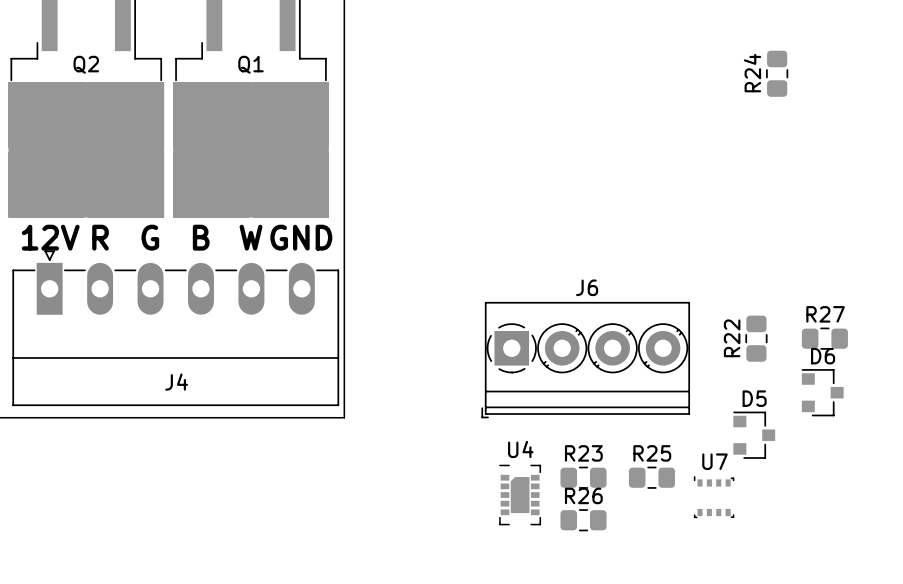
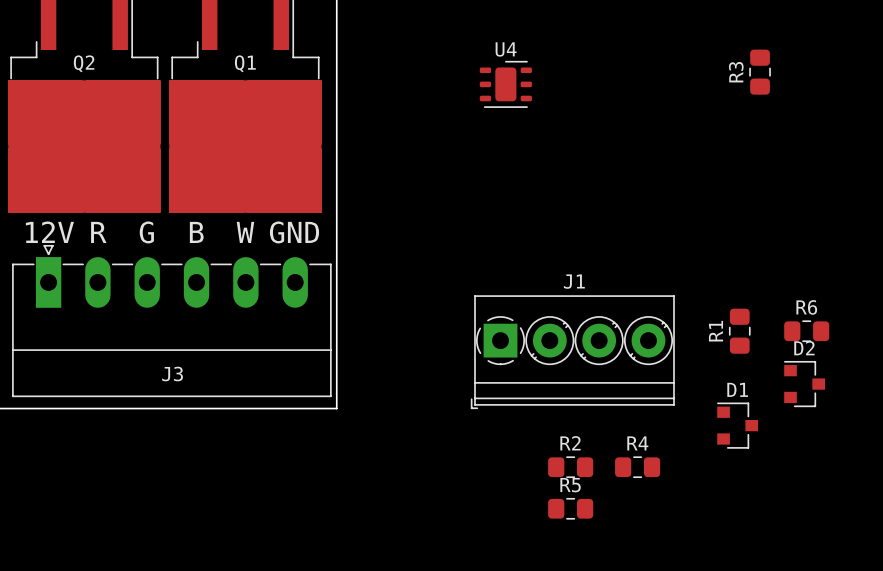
R24 name: R24 (752, 73) -> R3 (736, 72)
J6 name: J6 (587, 287) -> J1 (574, 281)
R27 name: R27 (825, 314) -> R6 (806, 307)
R22 name: R22 (732, 338) -> R1 (716, 331)
D6 name: D6 (823, 356) -> D2 (804, 348)
J4 name: J4 (176, 382) -> J3 (172, 374)
D5 name: D5 (754, 398) -> D1 (737, 389)
R23 name: R23 (583, 453) -> R2 (570, 443)
R25 name: R25 (652, 453) -> R4 (637, 443)
U4 footprint: [499, 464, 542, 526] -> [479, 60, 532, 108]
R26 name: R26 (583, 495) -> R5 (570, 485)
U7: (714, 497) -> none

